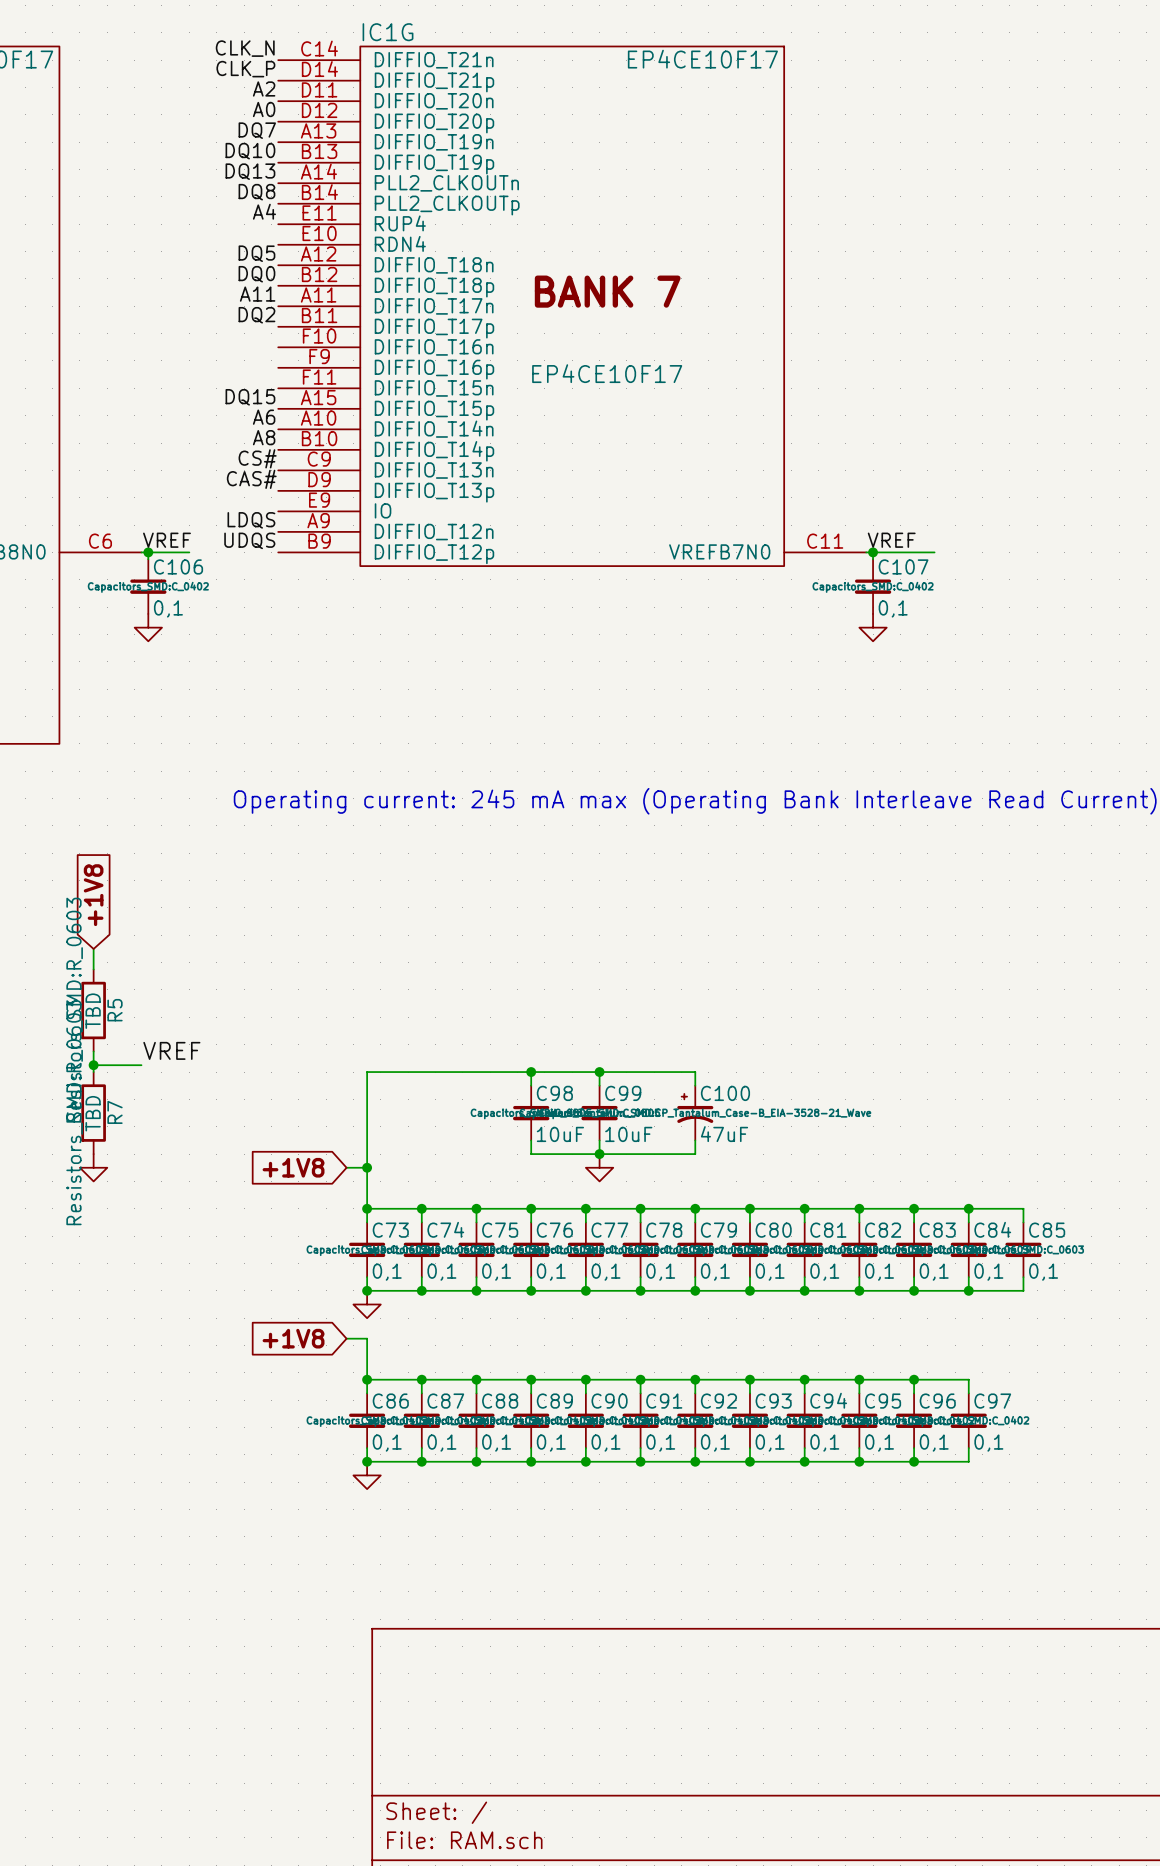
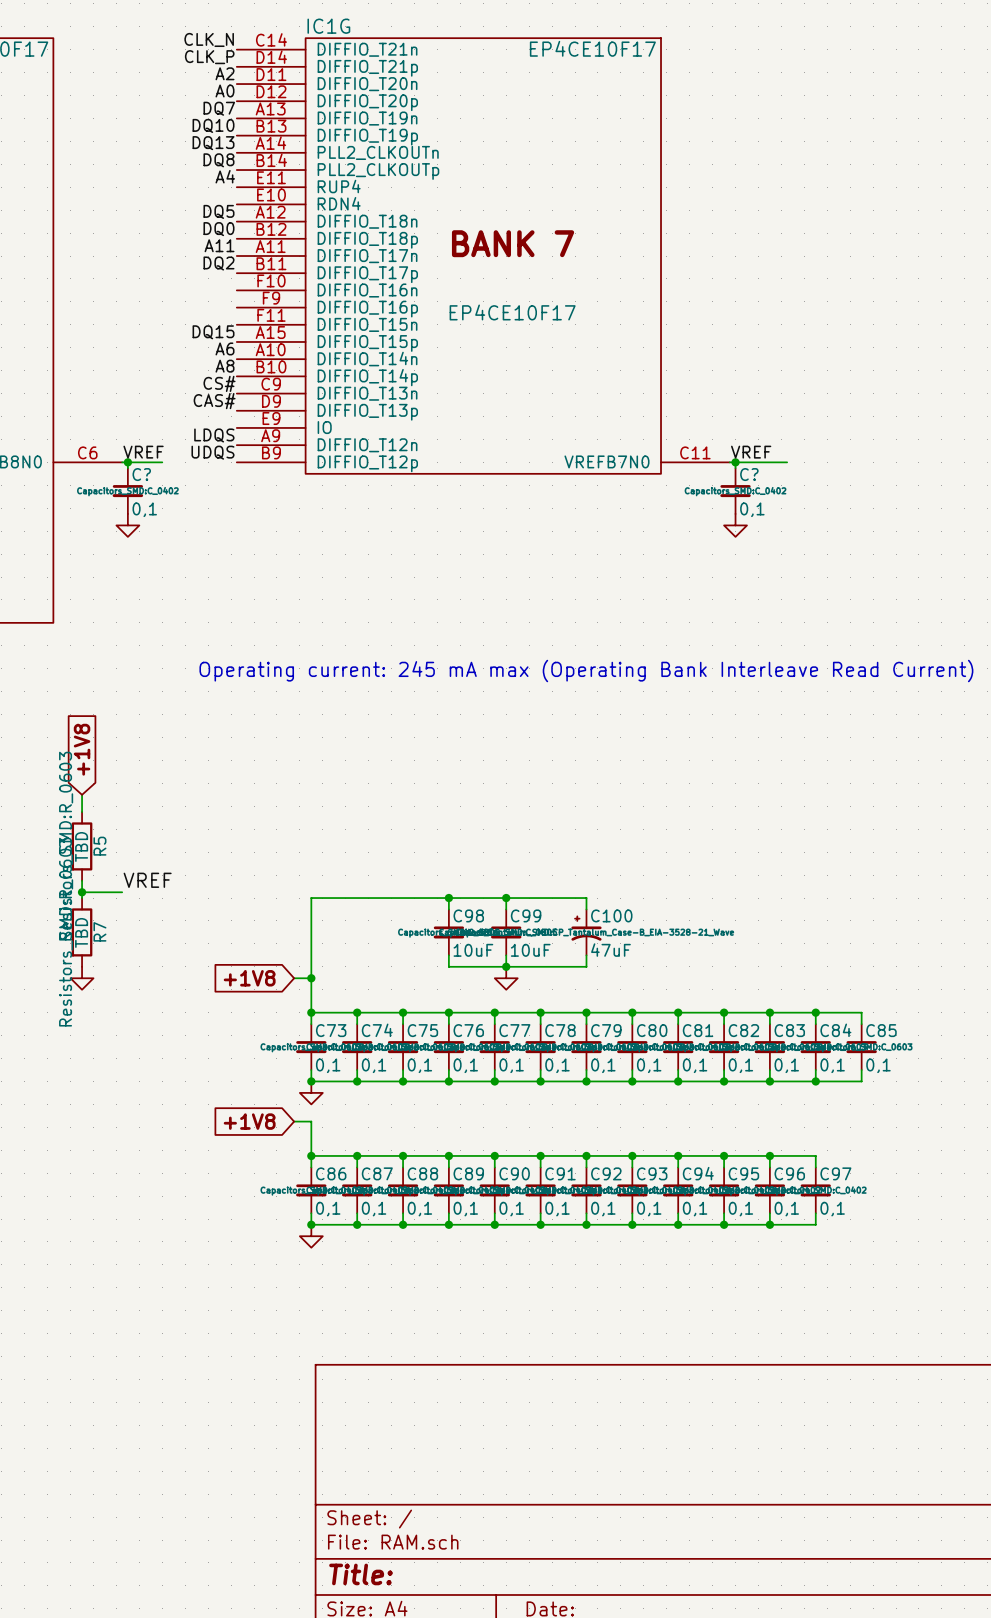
C106 name: C106 (178, 566) -> C? (141, 474)
C107 name: C107 (903, 566) -> C? (749, 474)

